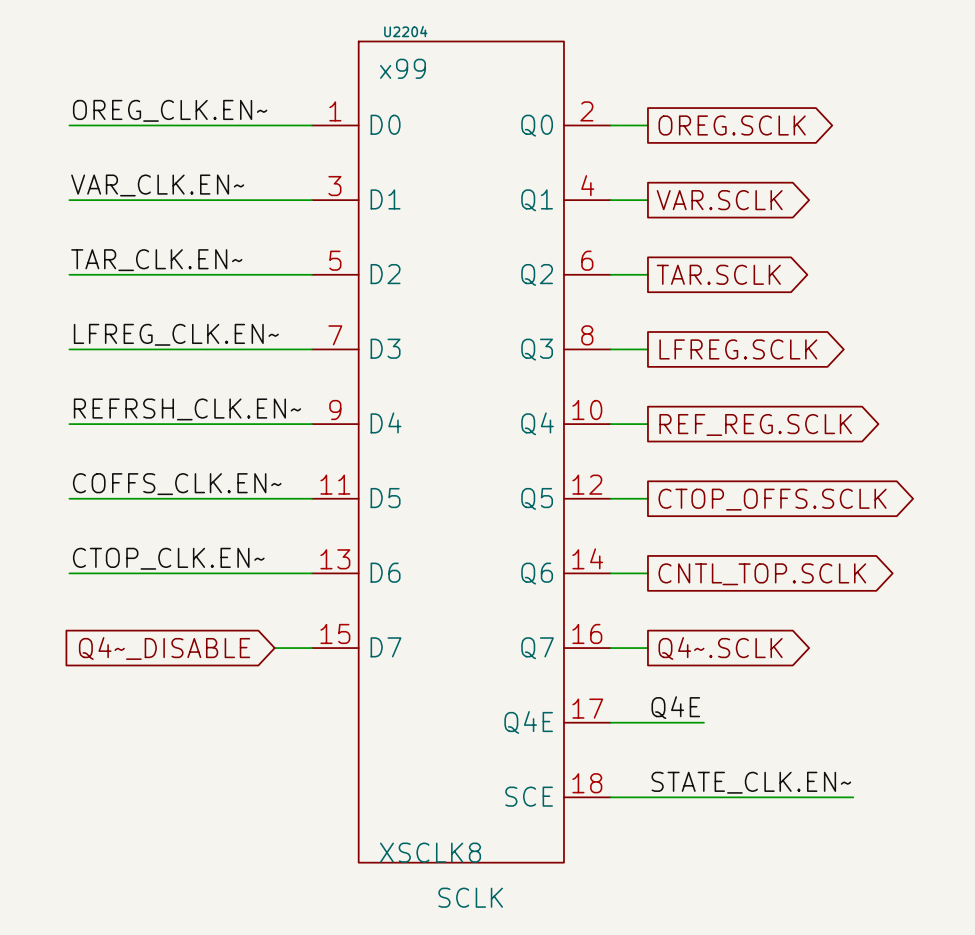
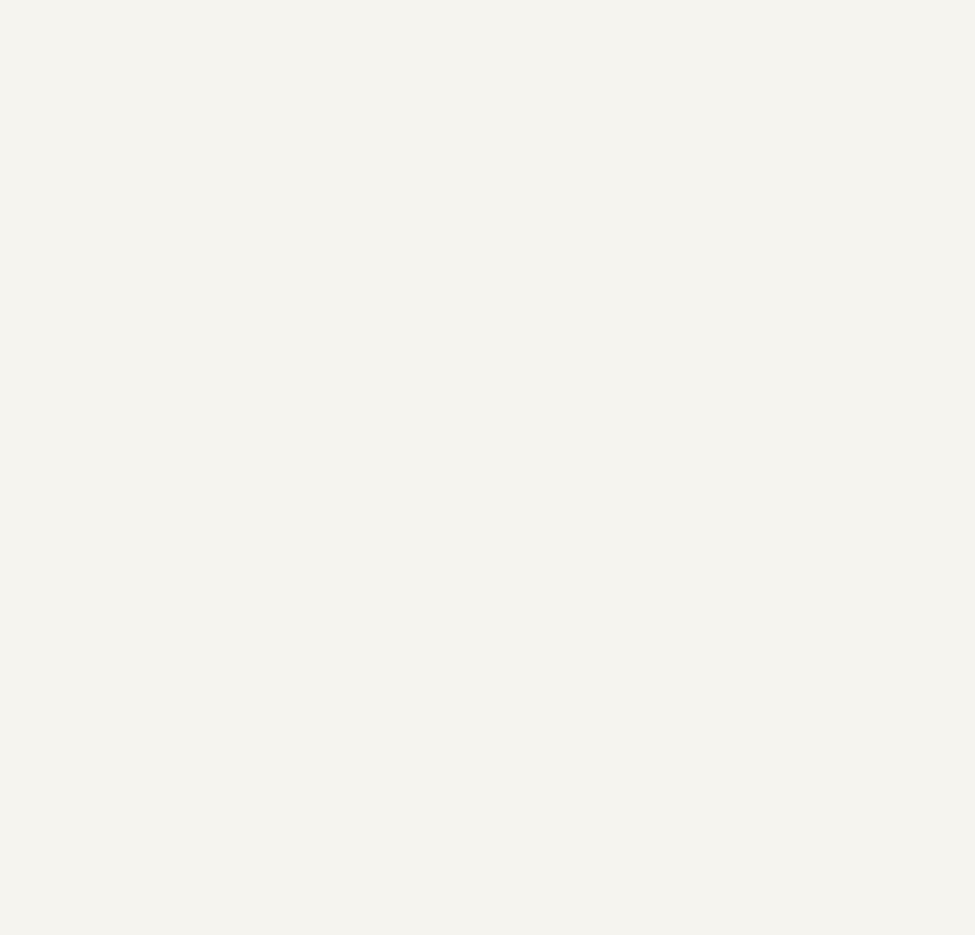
label: OREG_CLK.EN~ (170, 110) -> none
wire: (69, 125) (312, 125) -> none
wire: (610, 125) (647, 125) -> none
global label: OREG.SCLK (732, 125) -> none
label: VAR_CLK.EN~ (157, 185) -> none
wire: (69, 200) (312, 200) -> none
wire: (610, 200) (647, 200) -> none
global label: VAR.SCLK (719, 200) -> none
label: TAR_CLK.EN~ (156, 260) -> none
wire: (69, 274) (312, 274) -> none
wire: (610, 274) (647, 274) -> none
global label: TAR.SCLK (718, 274) -> none
label: LFREG_CLK.EN~ (176, 334) -> none
wire: (69, 349) (312, 349) -> none
wire: (610, 349) (647, 349) -> none
global label: LFREG.SCLK (738, 349) -> none
label: REFRSH_CLK.EN~ (187, 409) -> none
wire: (69, 424) (312, 424) -> none
wire: (610, 424) (647, 424) -> none
global label: REF_REG.SCLK (755, 424) -> none
U2204: XSCLK8 (461, 452) -> none
label: COFFS_CLK.EN~ (177, 484) -> none
wire: (69, 498) (312, 498) -> none
wire: (610, 498) (647, 498) -> none
global label: CTOP_OFFS.SCLK (772, 499) -> none
label: CTOP_CLK.EN~ (168, 558) -> none
wire: (69, 573) (312, 573) -> none
wire: (610, 573) (647, 573) -> none
global label: CNTL_TOP.SCLK (762, 574) -> none
global label: Q4~_DISABLE (164, 648) -> none
wire: (274, 648) (312, 648) -> none
wire: (610, 648) (647, 648) -> none
global label: Q4~.SCLK (720, 648) -> none
label: Q4E (675, 707) -> none
wire: (610, 722) (703, 722) -> none
label: STATE_CLK.EN~ (751, 782) -> none
wire: (610, 797) (853, 797) -> none

